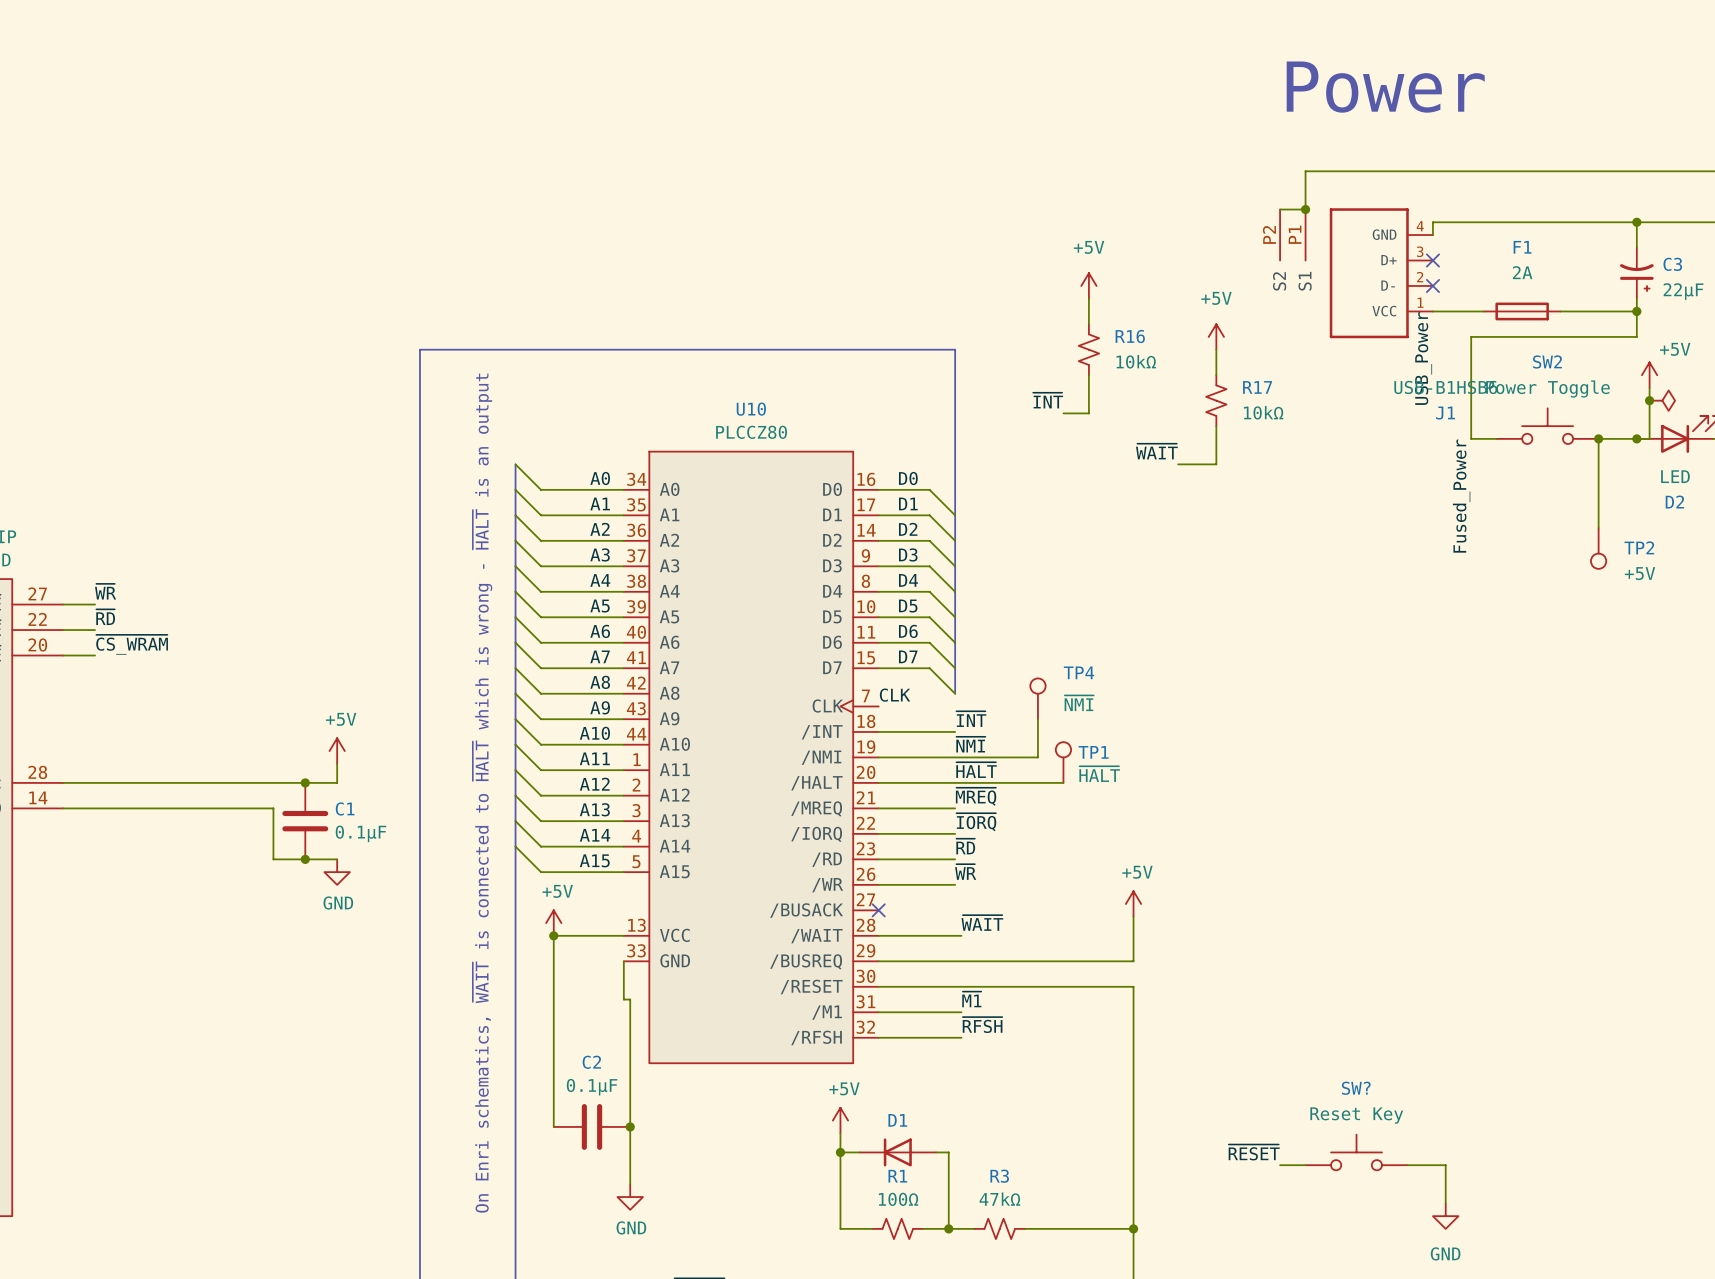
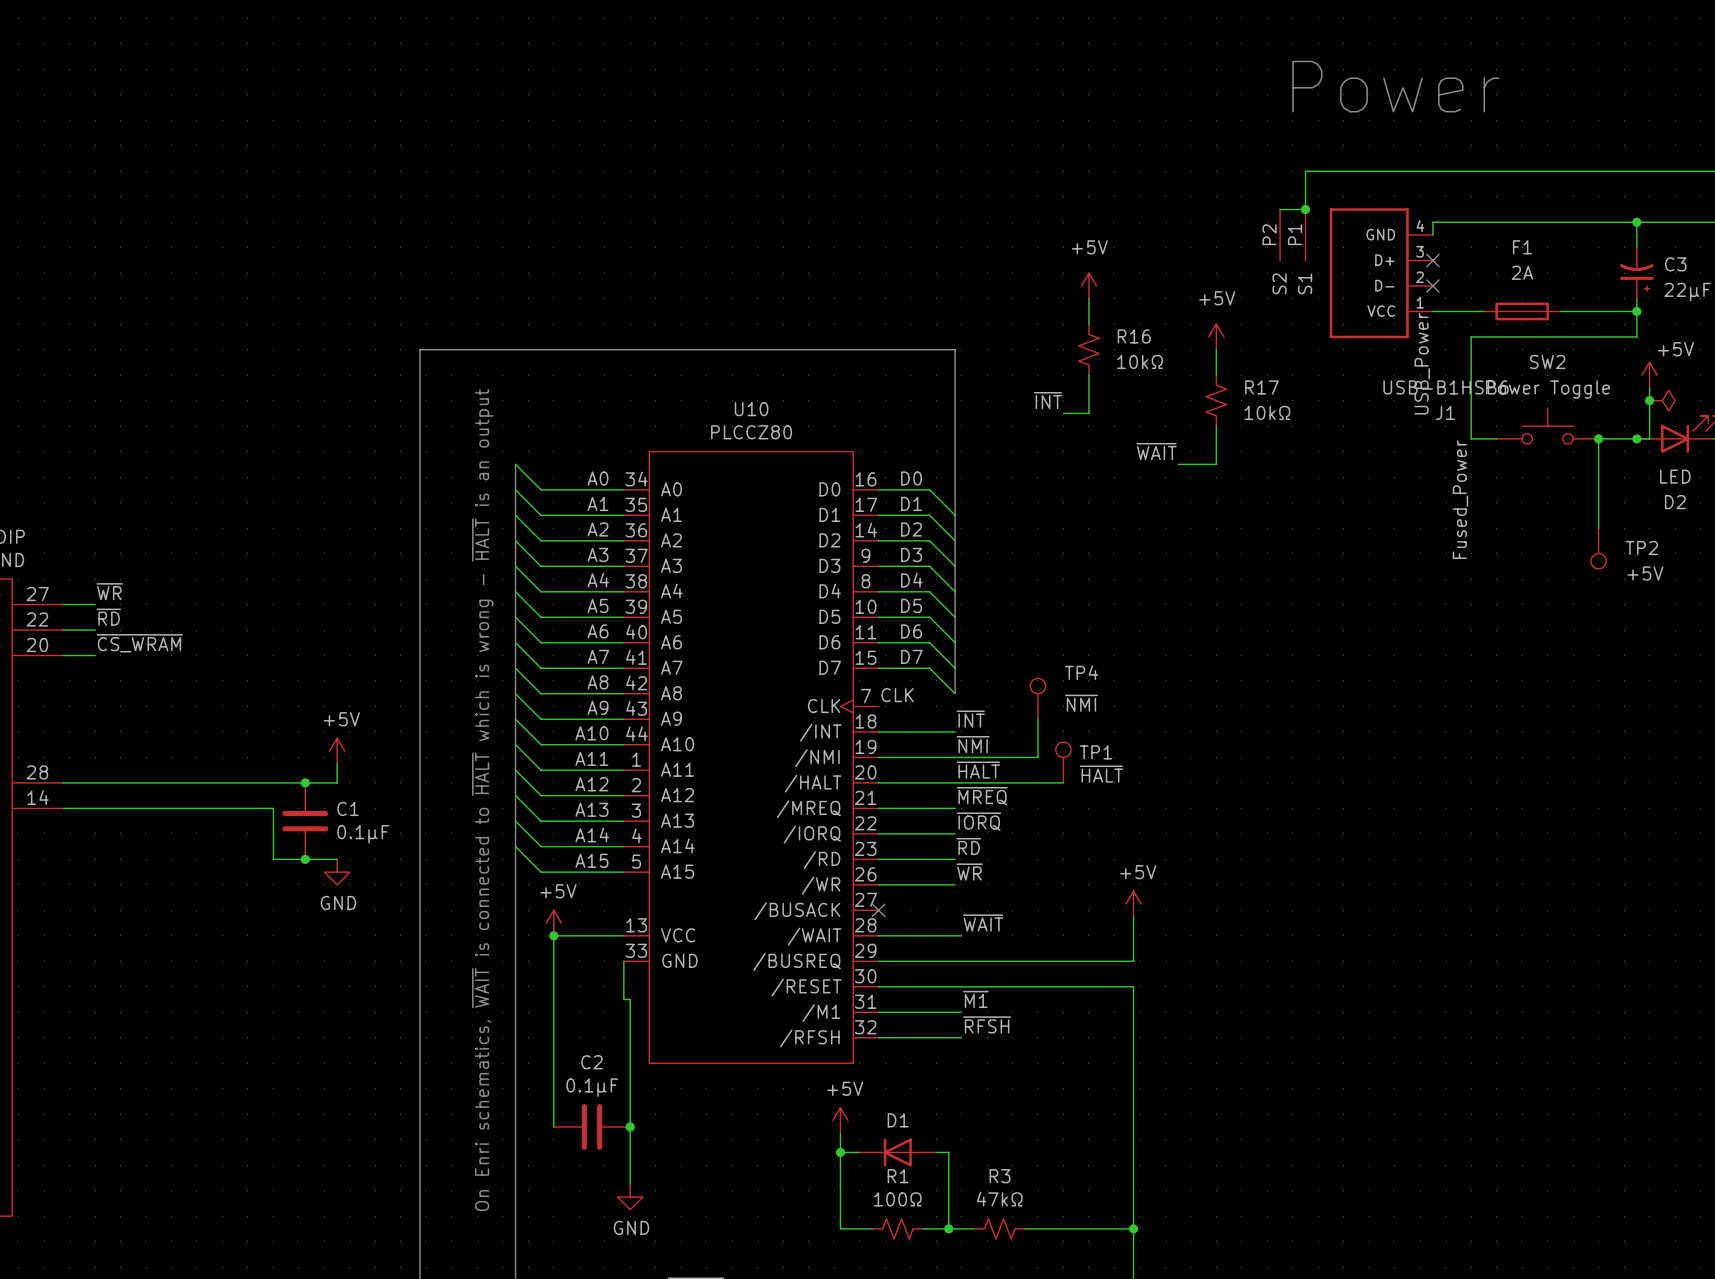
label: ~{RESET} (1254, 1152) -> none
SW?: Reset Key (1356, 1152) -> none
wire: (1280, 1165) (1305, 1165) -> none
wire: (1407, 1165) (1445, 1165) (1445, 1203) -> none
power symbol: GND (1445, 1216) -> none

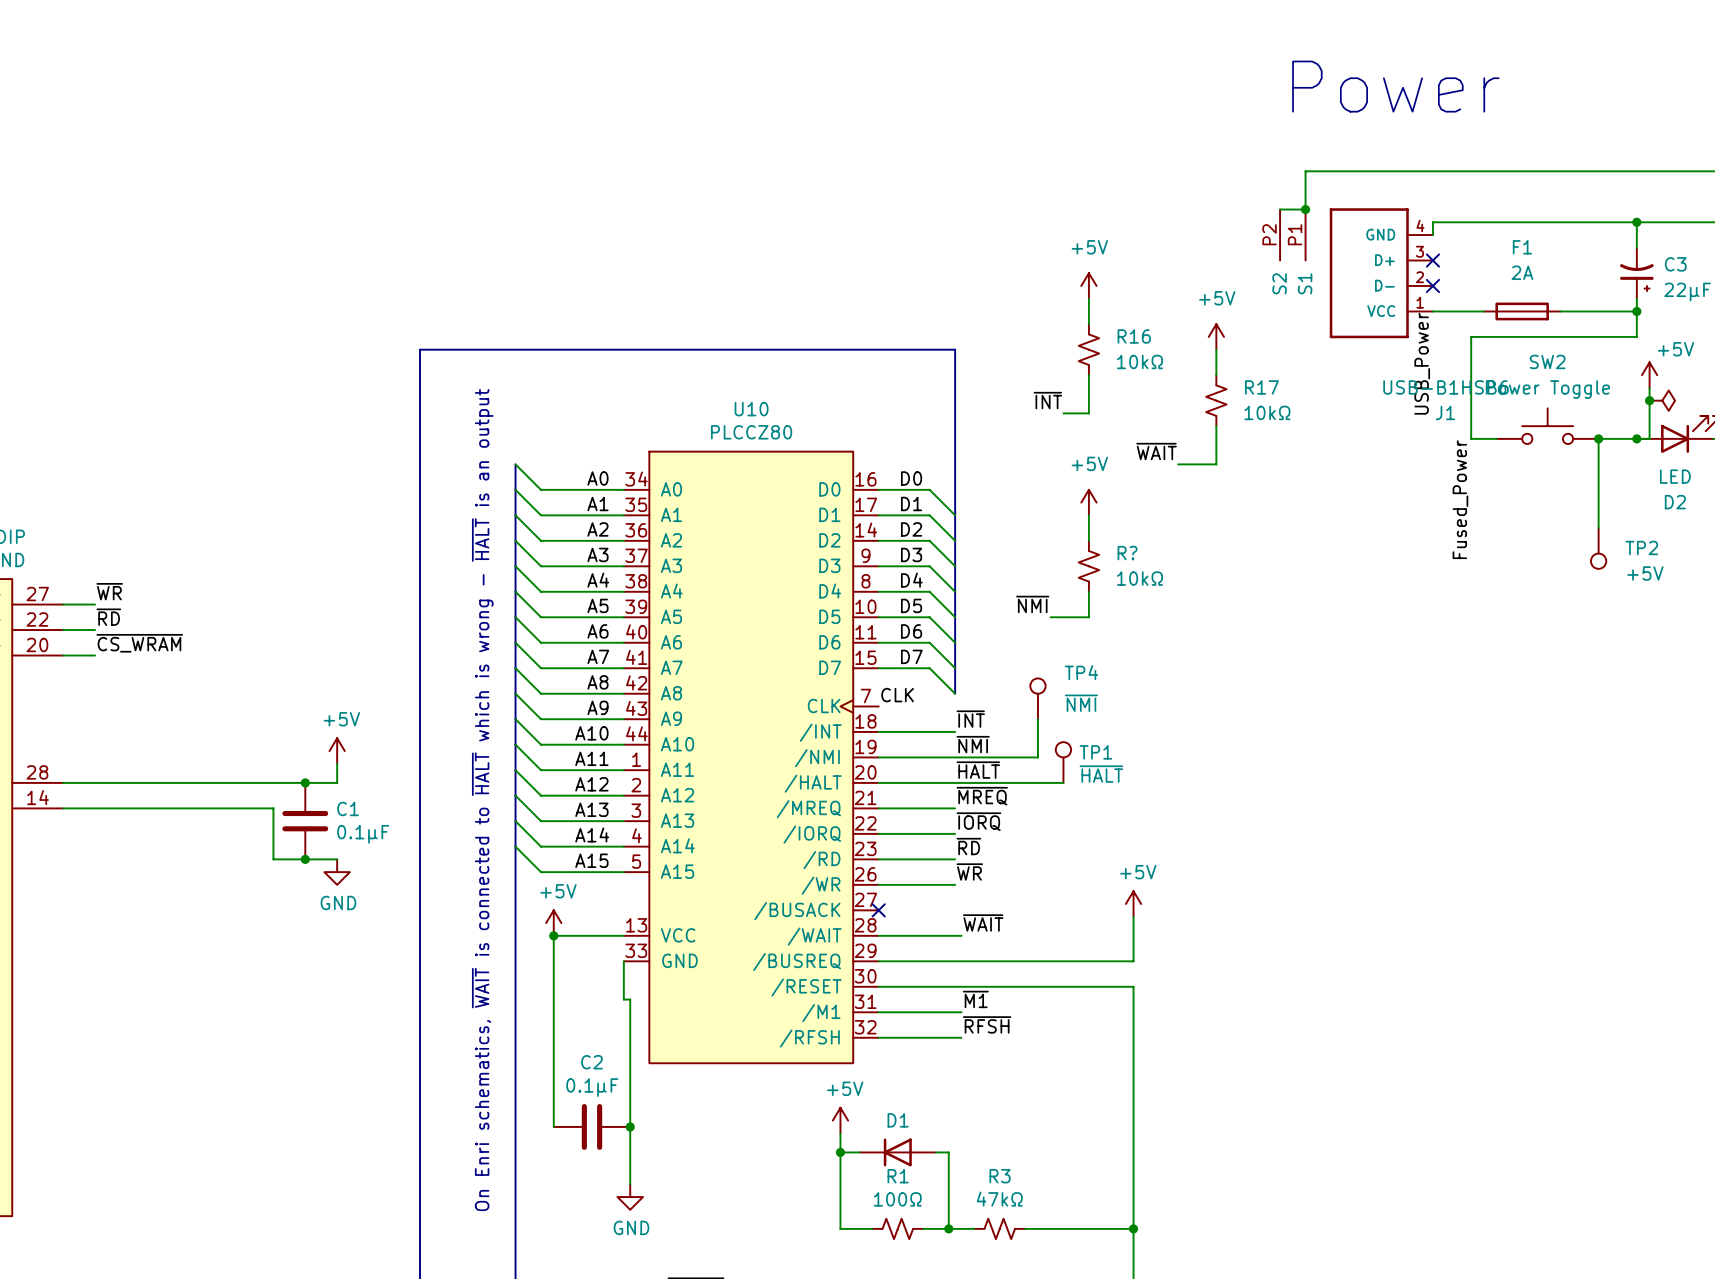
power symbol: none -> +5V (1088, 502)
wire: none -> (1088, 515) (1088, 540)
R?: none -> 10kΩ (1088, 566)
wire: none -> (1088, 591) (1088, 617) (1050, 617)
label: none -> ~{NMI} (1032, 604)

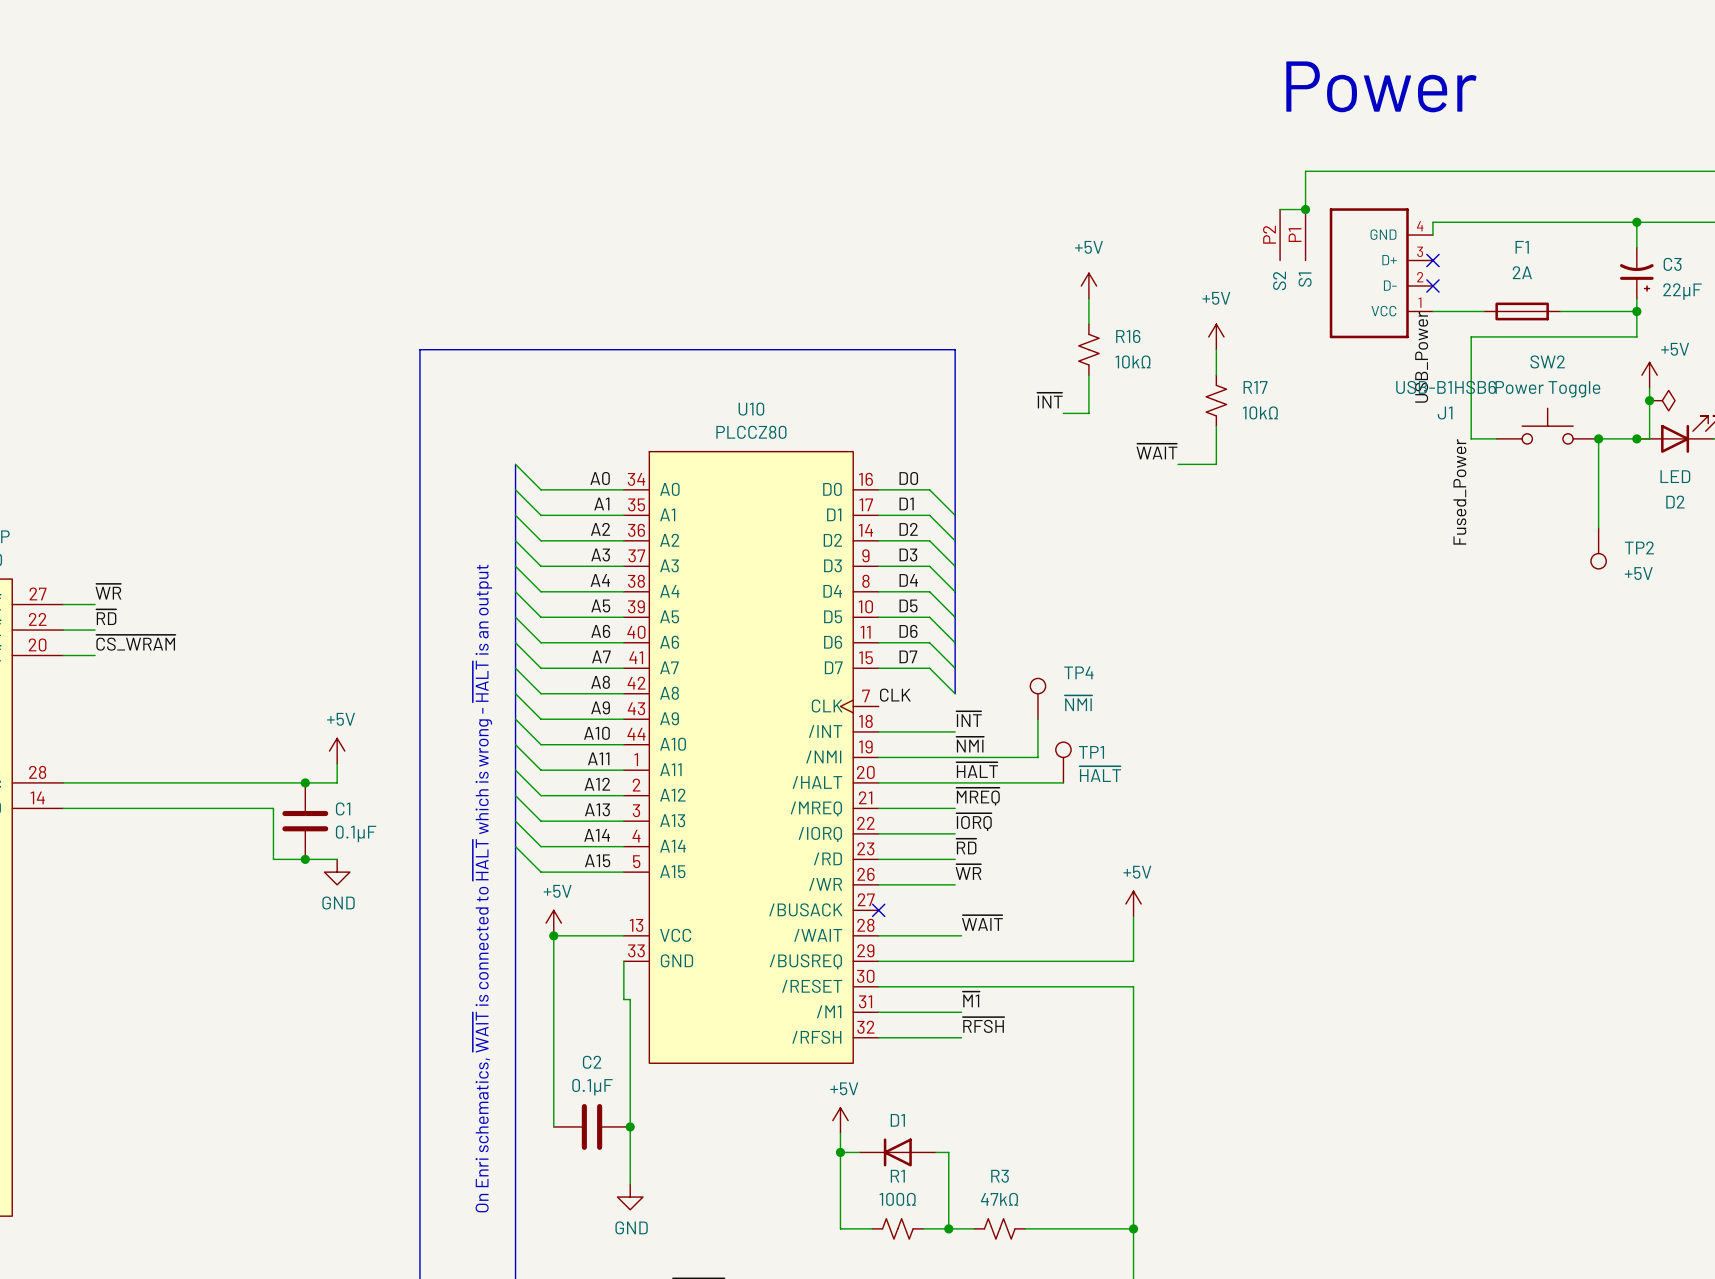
power symbol: +5V (1088, 502) -> none
wire: (1088, 515) (1088, 540) -> none
R?: 10kΩ (1088, 566) -> none
wire: (1088, 591) (1088, 617) (1050, 617) -> none
label: ~{NMI} (1032, 604) -> none

